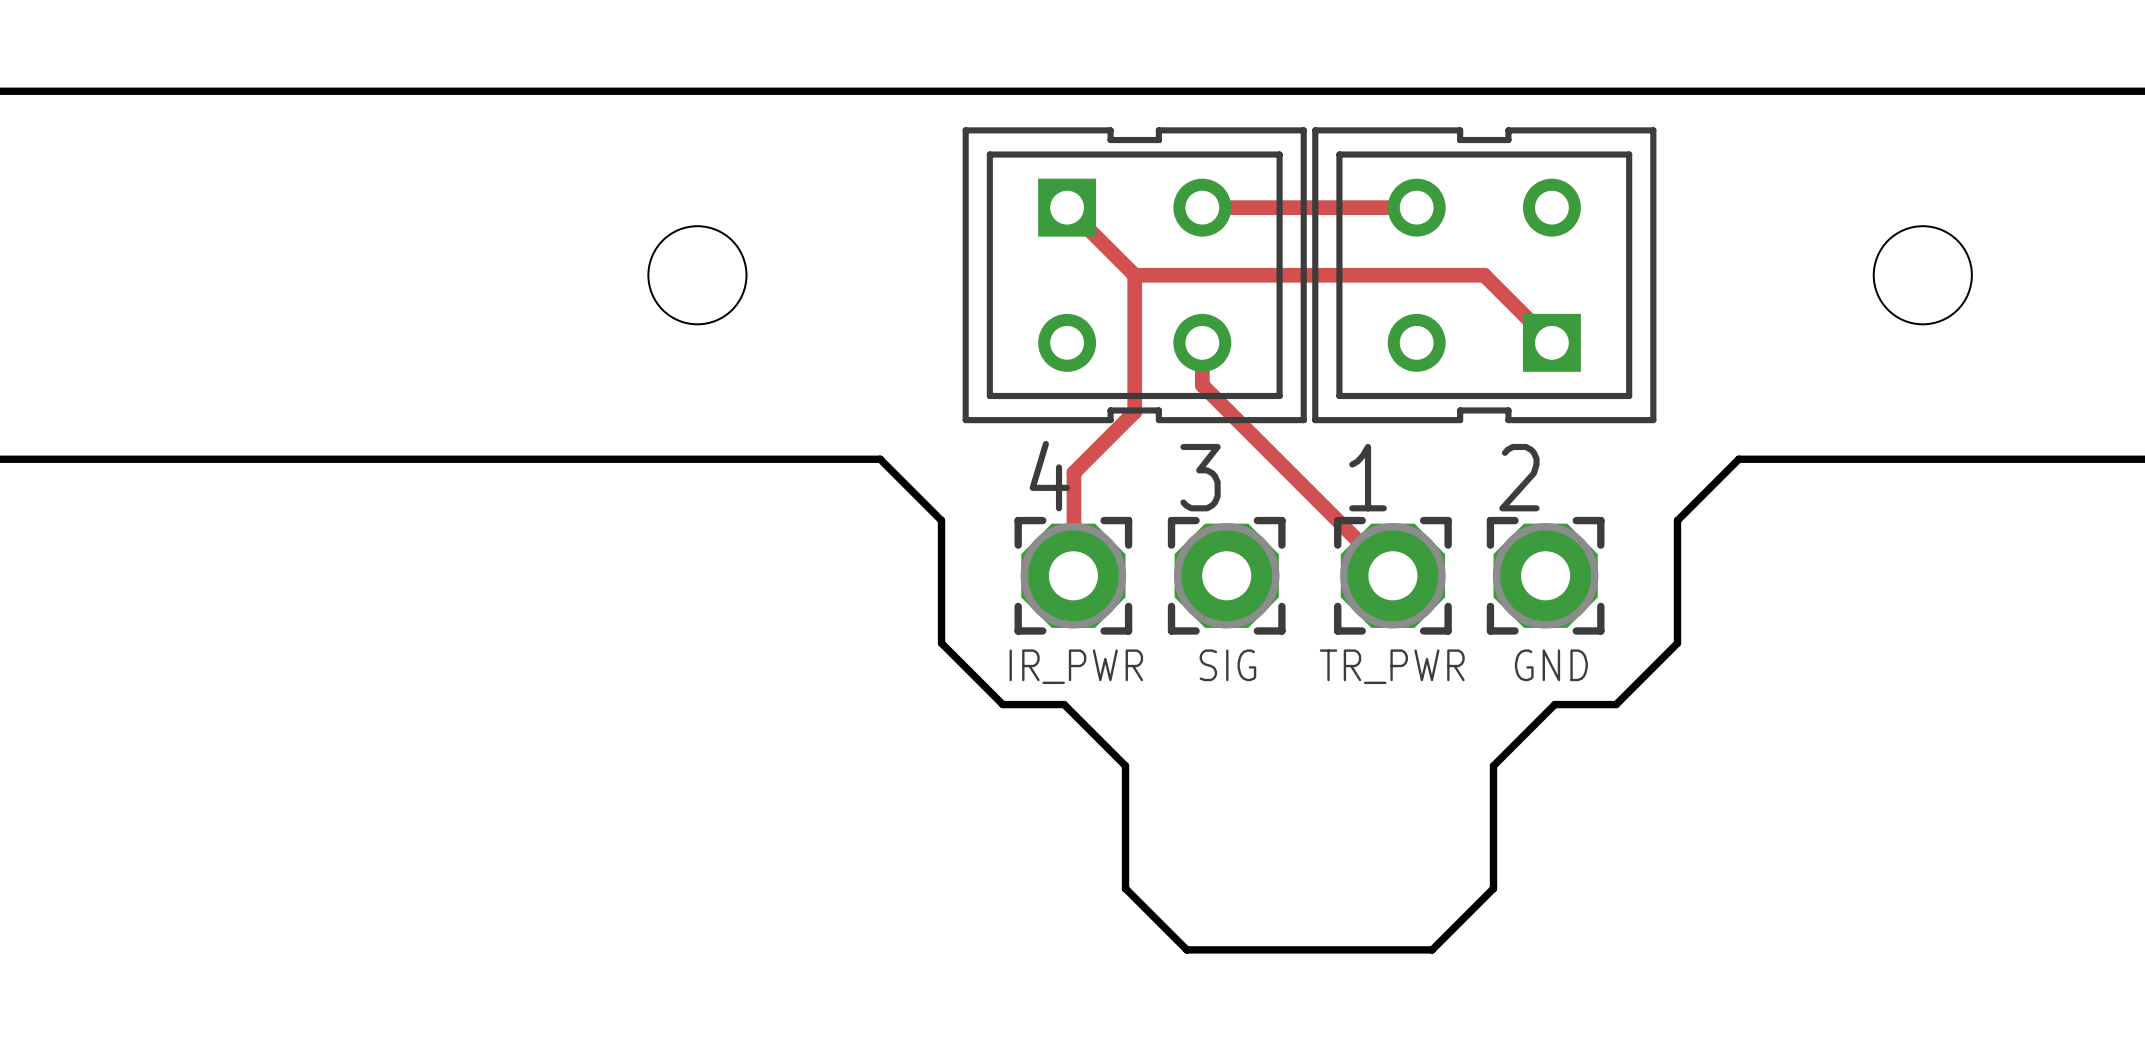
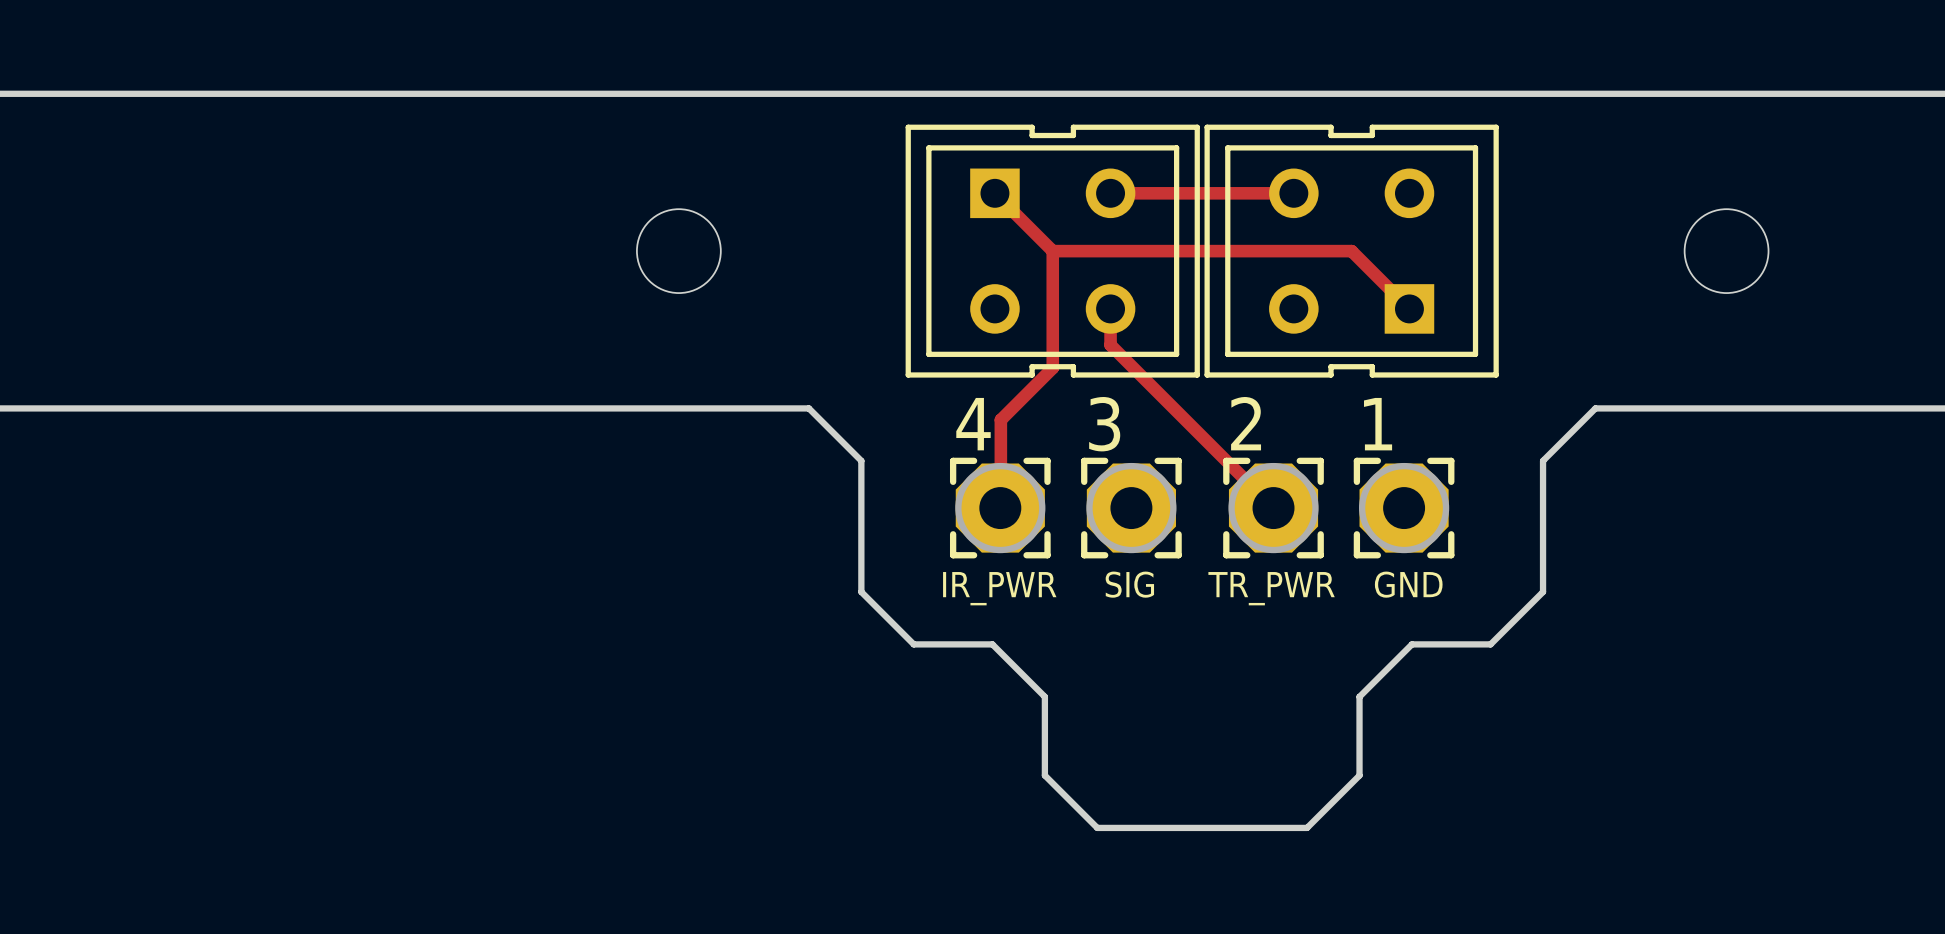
board edge: (849, 459) (880, 459) (941, 520) (941, 643) (1002, 704) (1064, 704) (1125, 765) (1125, 796) -> (808, 408) (861, 460) (861, 591) (913, 644) (992, 644) (1044, 696)
board edge: (1769, 459) (1738, 459) (1677, 520) (1677, 643) (1616, 704) (1554, 704) (1493, 765) (1493, 796) -> (1595, 408) (1543, 460) (1543, 591) (1490, 644) (1411, 644) (1359, 696)
1 name: 1 (1368, 477) -> 2 (1246, 423)
2 name: 2 (1519, 477) -> 1 (1378, 424)

